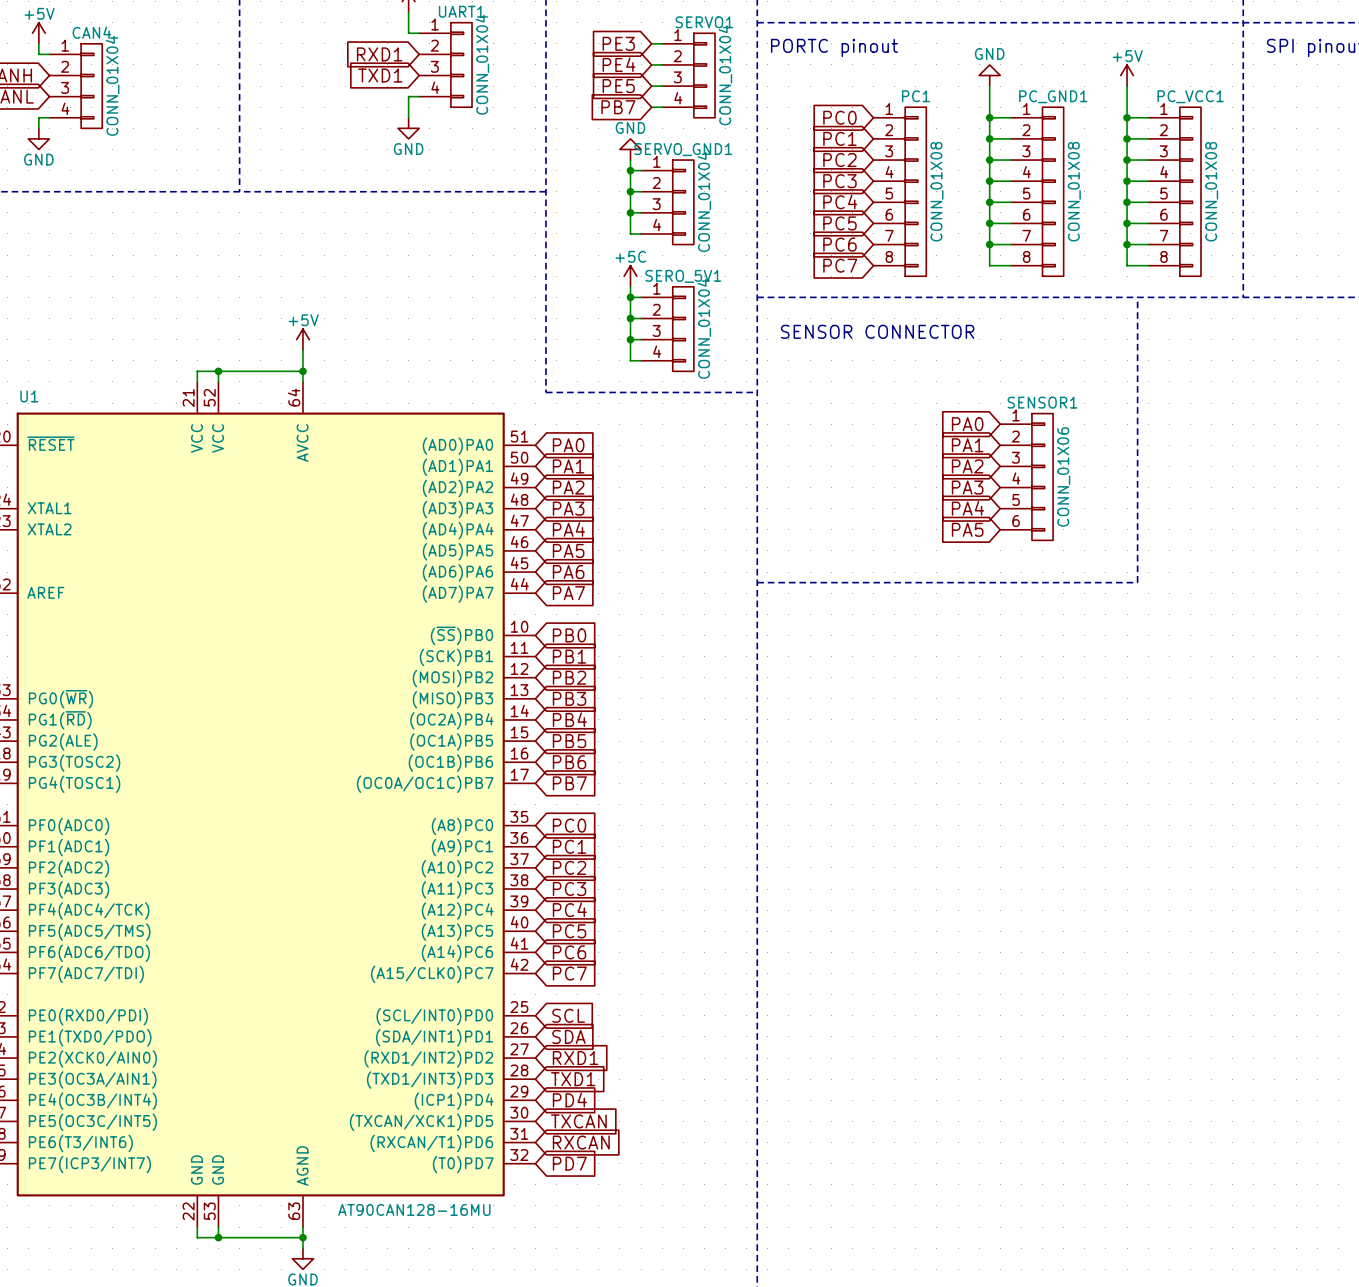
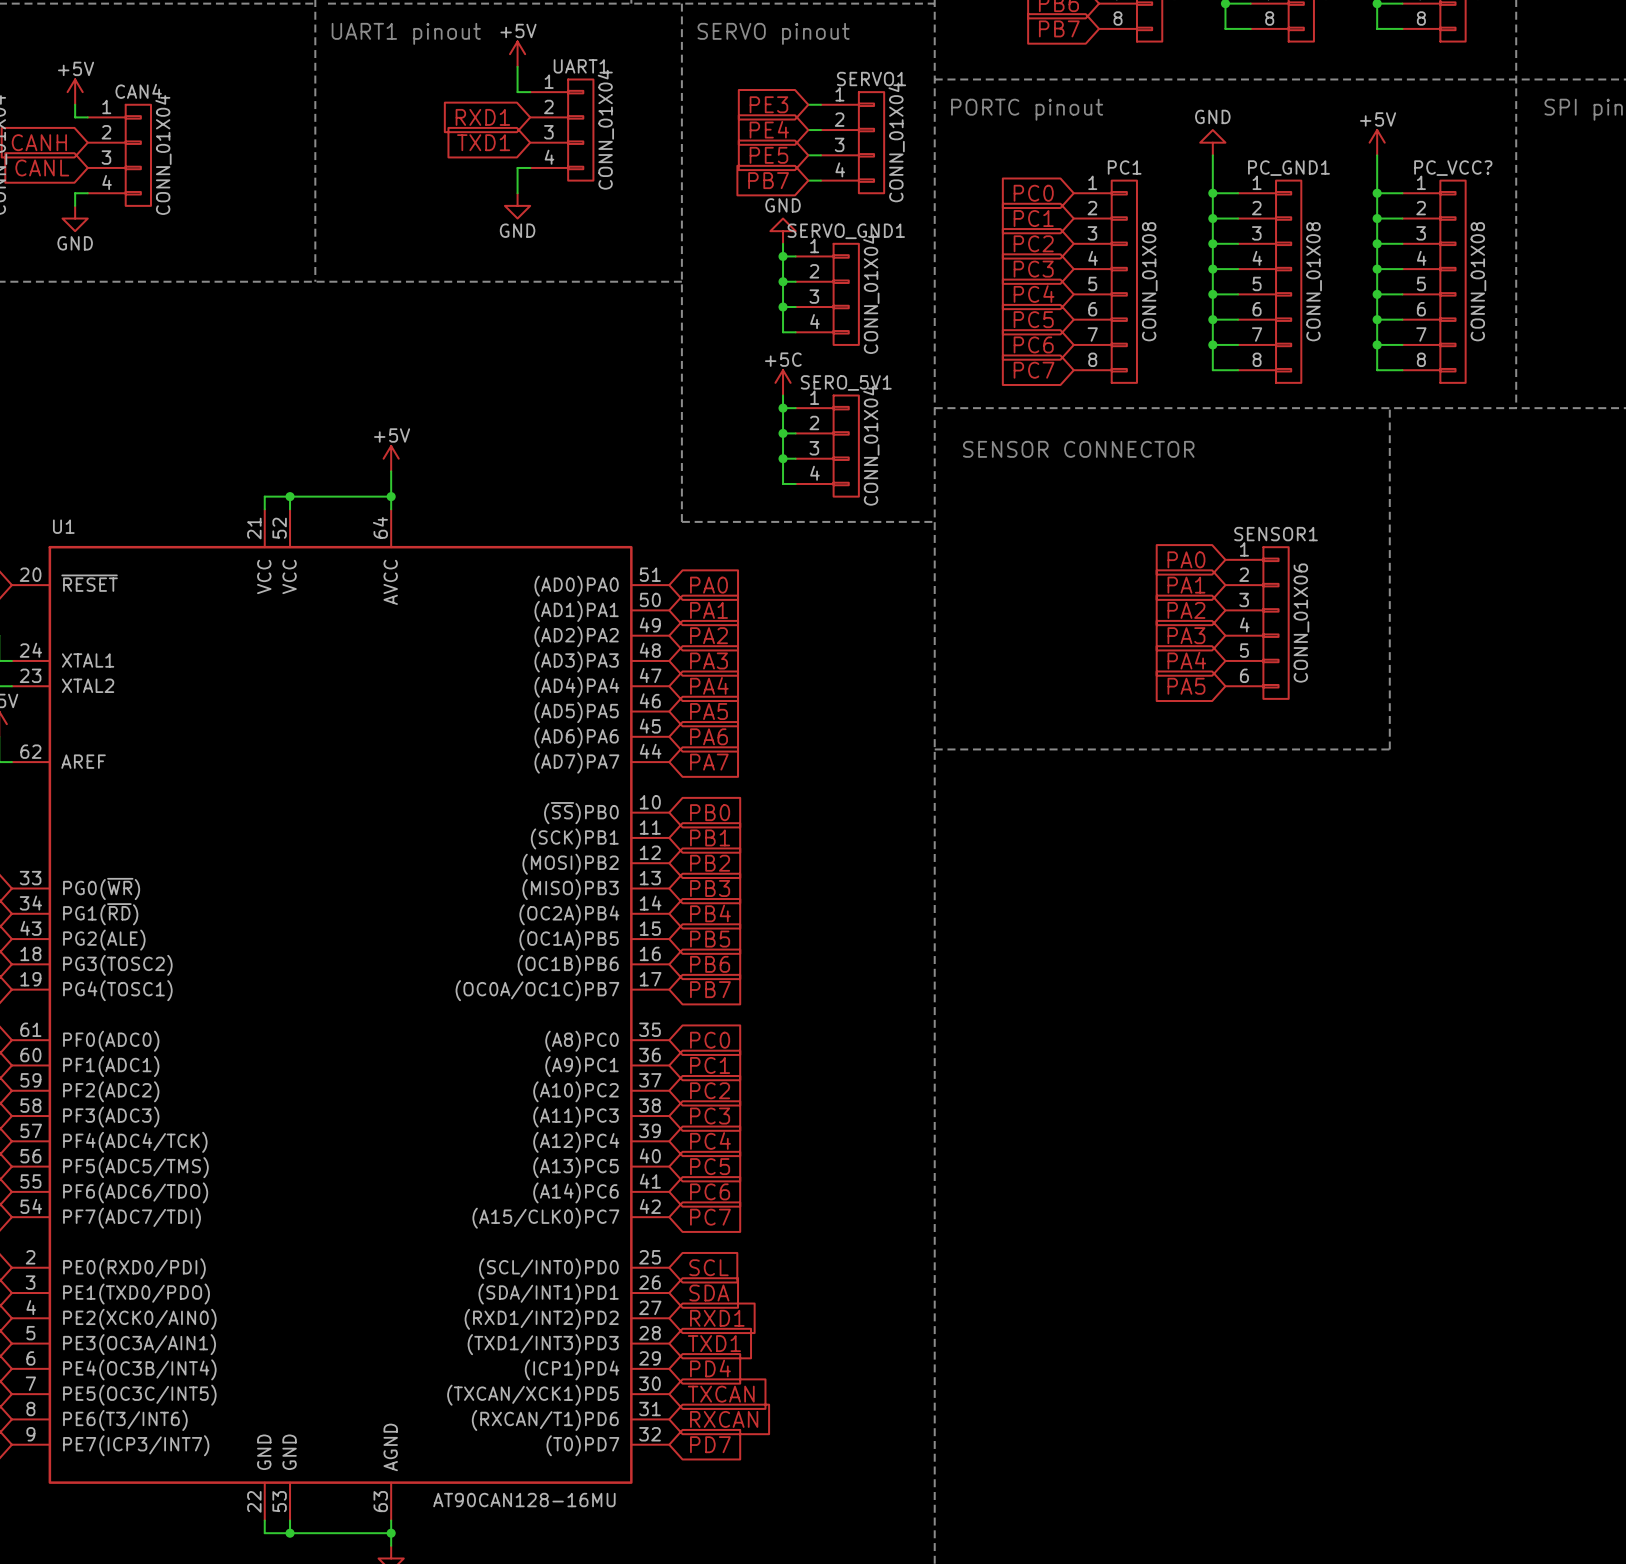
PC_VCC1 name: PC_VCC1 (1190, 96) -> PC_VCC? (1453, 168)

